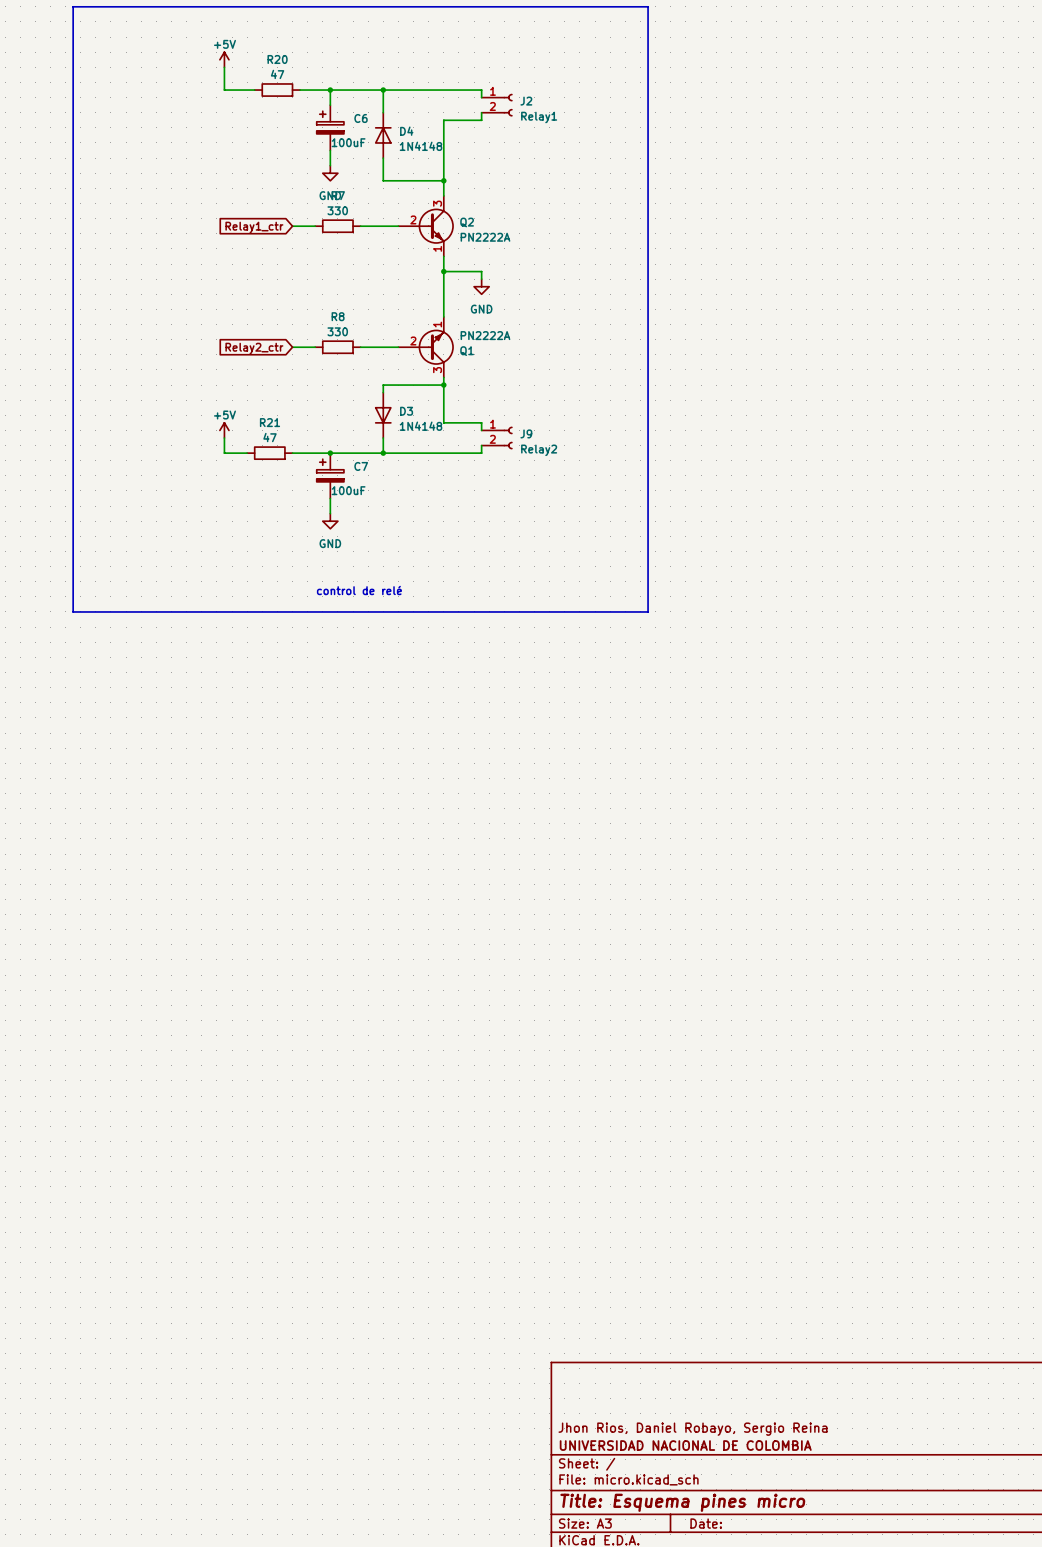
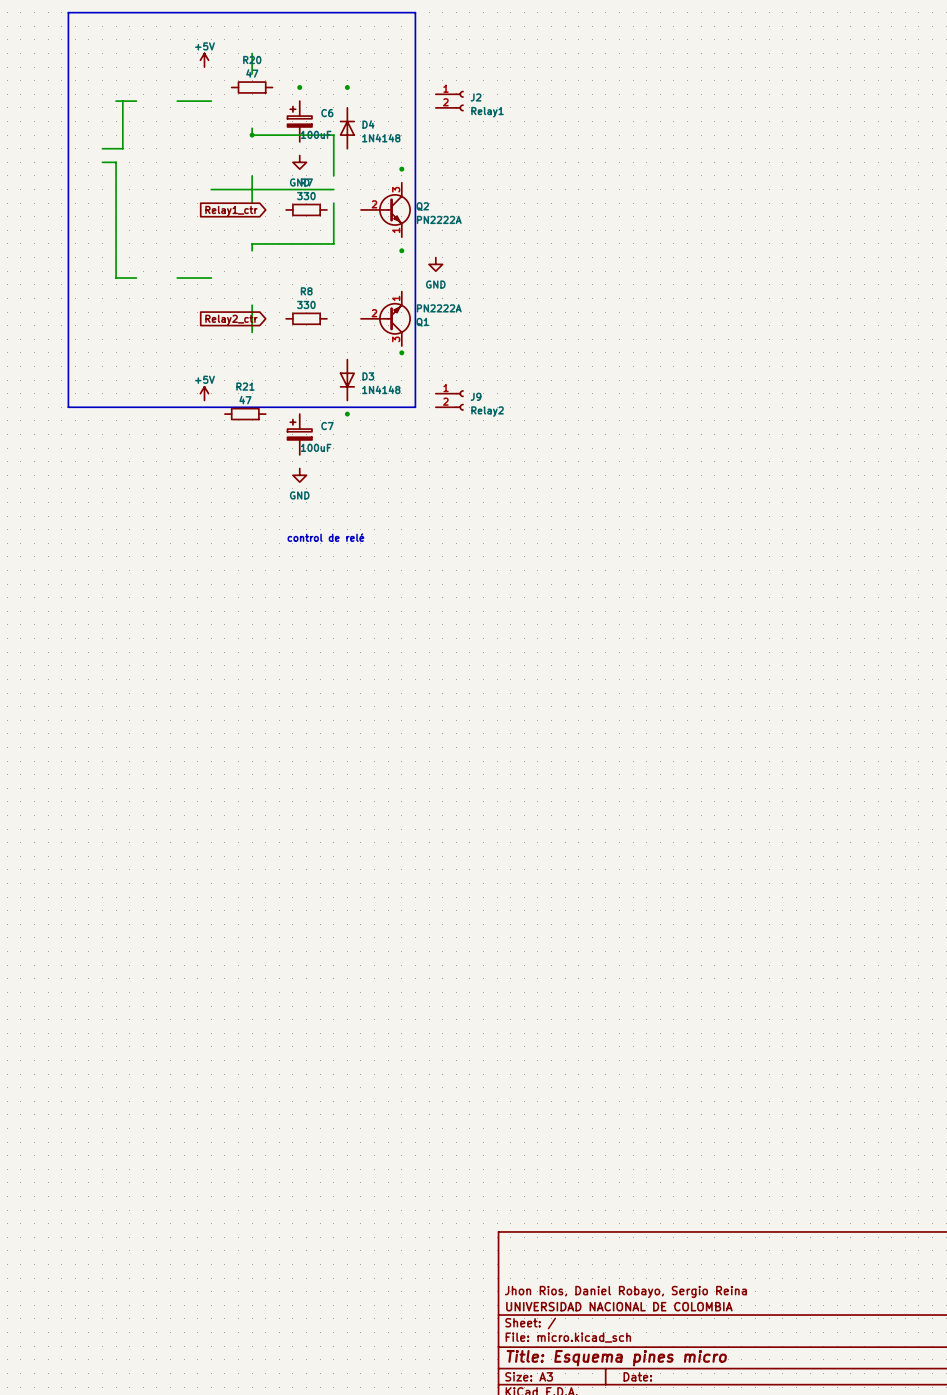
line: (458, 6) (648, 6) (648, 611) (73, 611) (73, 445) -> (415, 12) (415, 407) (68, 407)
wire: (224, 67) (224, 90) (254, 90) -> none
wire: (300, 90) (481, 90) (481, 97) -> none
wire: (330, 90) (330, 105) -> none
wire: (383, 90) (383, 112) -> (252, 53) (252, 73)
wire: none -> (116, 101) (136, 101)
wire: none -> (122, 101) (122, 148) (102, 148)
wire: none -> (177, 101) (211, 101)
wire: (481, 112) (481, 120) (443, 120) (443, 195) -> none
wire: none -> (252, 128) (252, 135) (333, 135) (333, 175)
junction: none -> (252, 135)
wire: (330, 150) (330, 165) -> none
wire: (383, 158) (383, 180) (443, 180) -> none
wire: none -> (102, 162) (116, 162) (116, 278) (136, 278)
wire: none -> (252, 175) (252, 203)
wire: none -> (211, 189) (333, 189)
wire: none -> (333, 203) (333, 243) (252, 243) (252, 250)
wire: (292, 226) (315, 226) -> none
wire: (360, 226) (398, 226) -> none
wire: (443, 256) (443, 316) -> none
wire: (443, 271) (481, 271) (481, 279) -> none
wire: none -> (177, 278) (211, 278)
wire: none -> (252, 305) (252, 332)
wire: (292, 347) (315, 347) -> none
wire: (360, 347) (398, 347) -> none
wire: (443, 377) (443, 422) (481, 422) (481, 430) -> none
wire: (443, 385) (383, 385) (383, 392) -> none
wire: (224, 438) (224, 453) (247, 453) -> none
wire: (383, 438) (383, 453) -> none
wire: (481, 445) (481, 453) (292, 453) -> none
junction: (330, 453) -> none
wire: (330, 498) (330, 513) -> none

